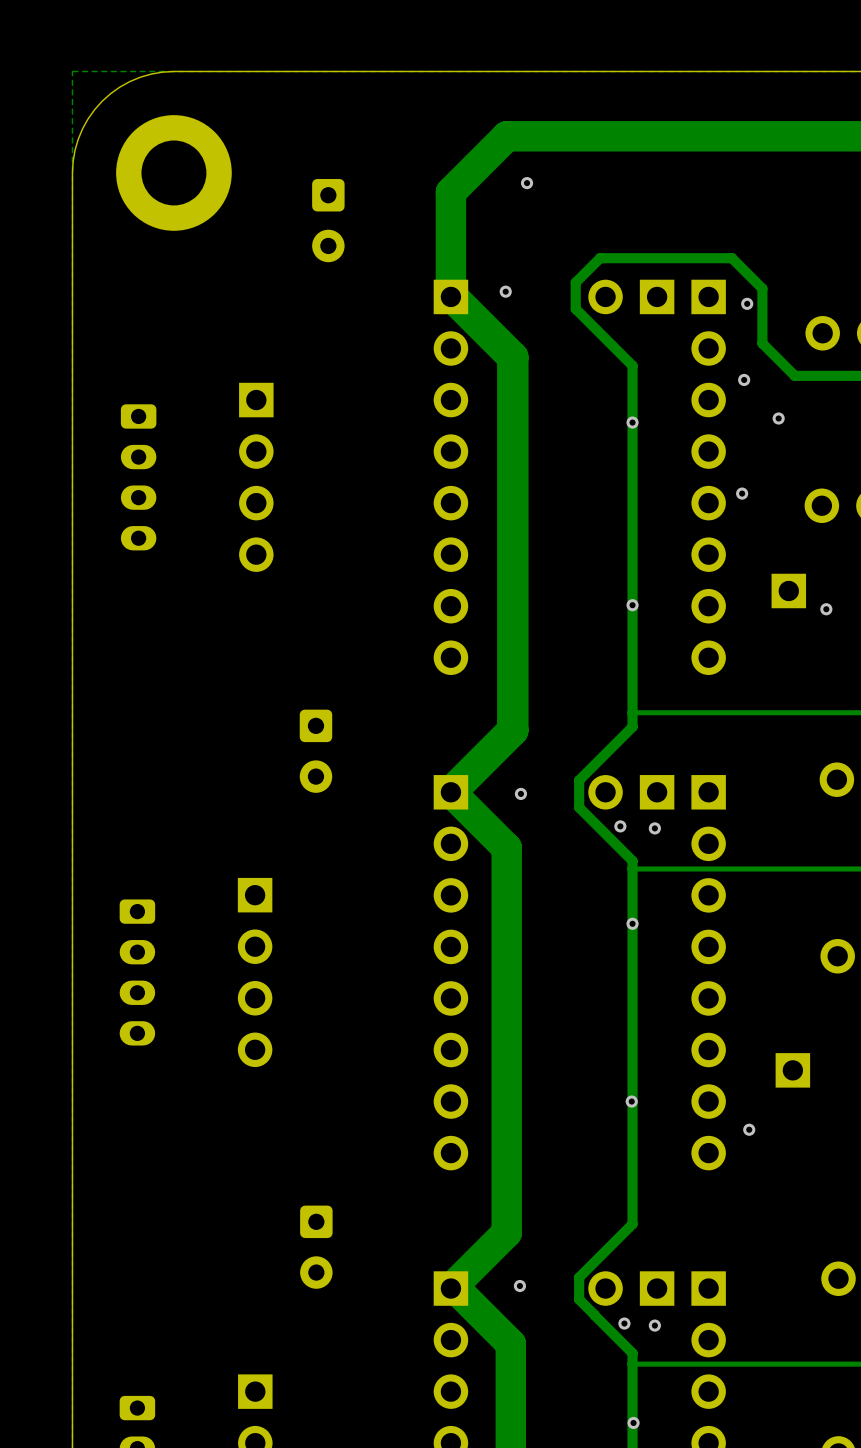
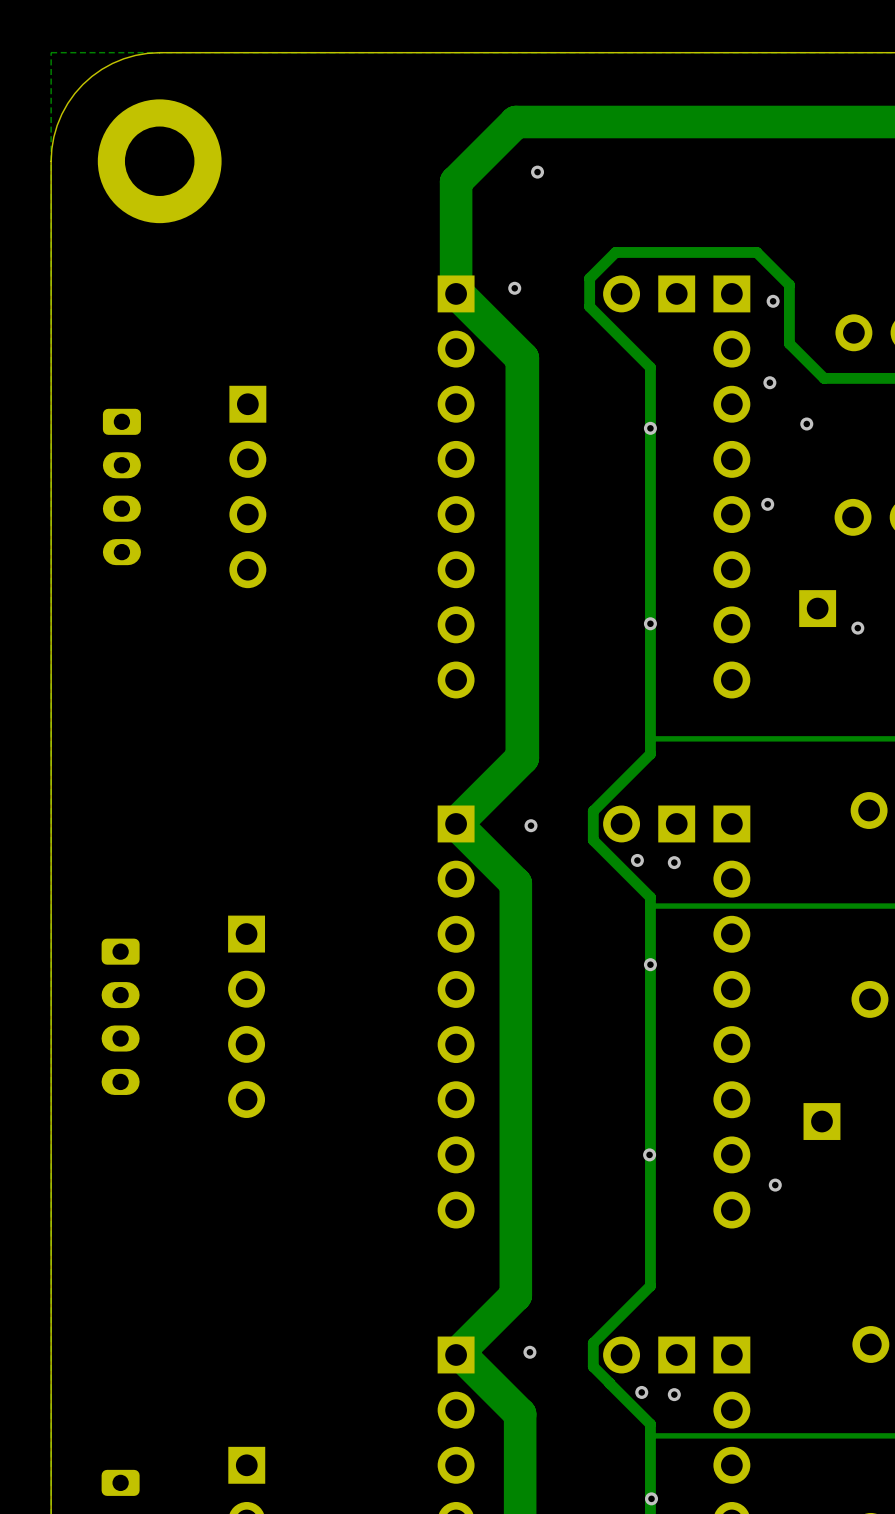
part: (328, 220) -> none
part: (315, 751) -> none
part: (316, 1247) -> none

